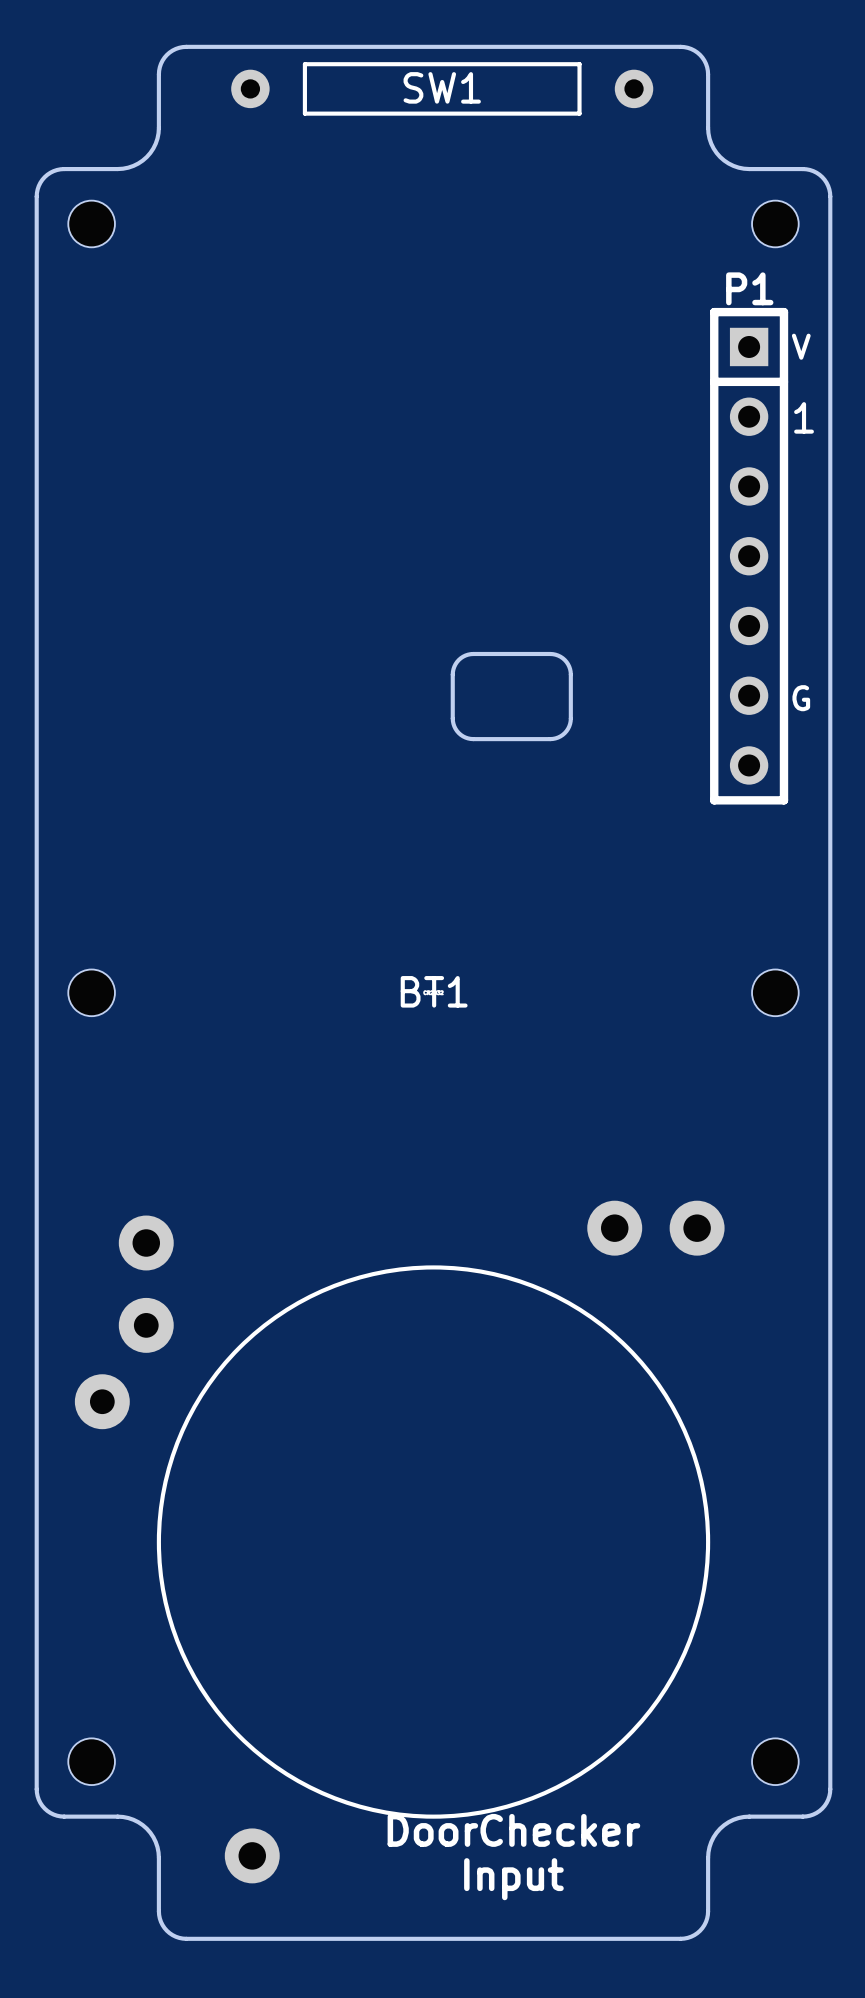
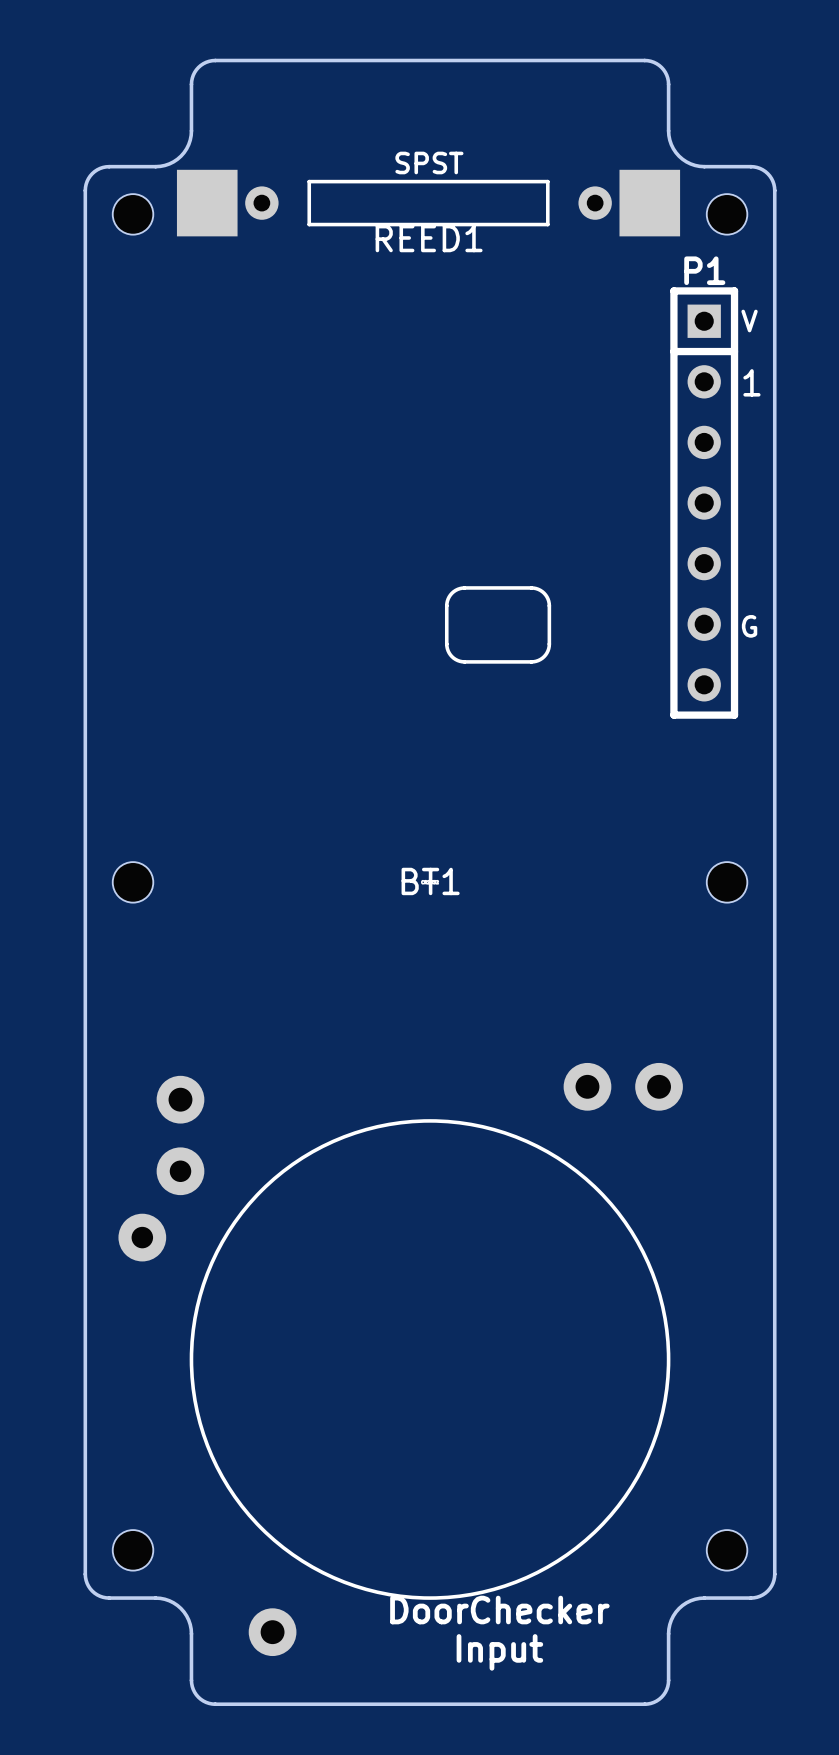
SW1: (442, 88) -> none
REED1: none -> SPST (428, 203)
part footprint: [450, 651, 573, 742] -> [444, 586, 552, 664]

